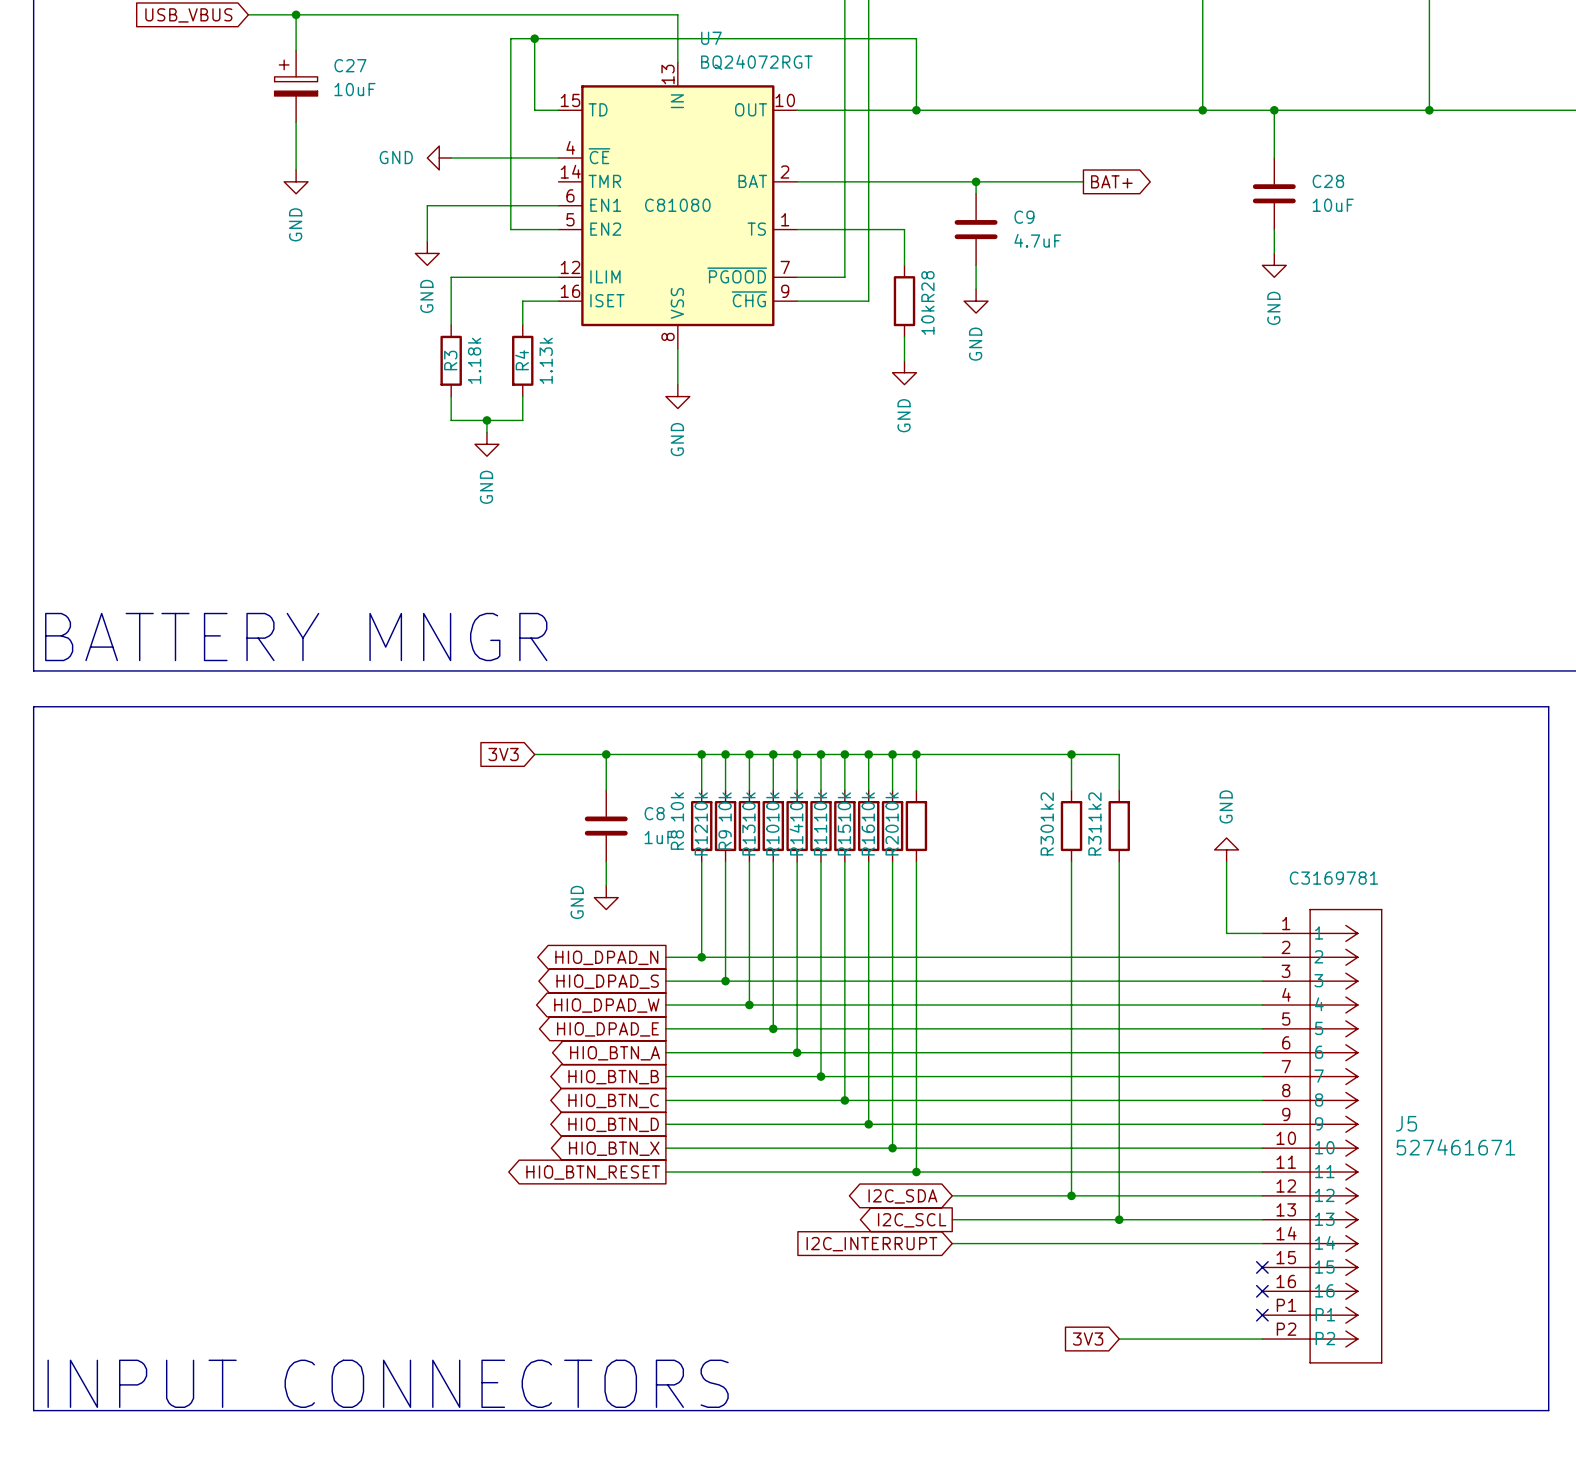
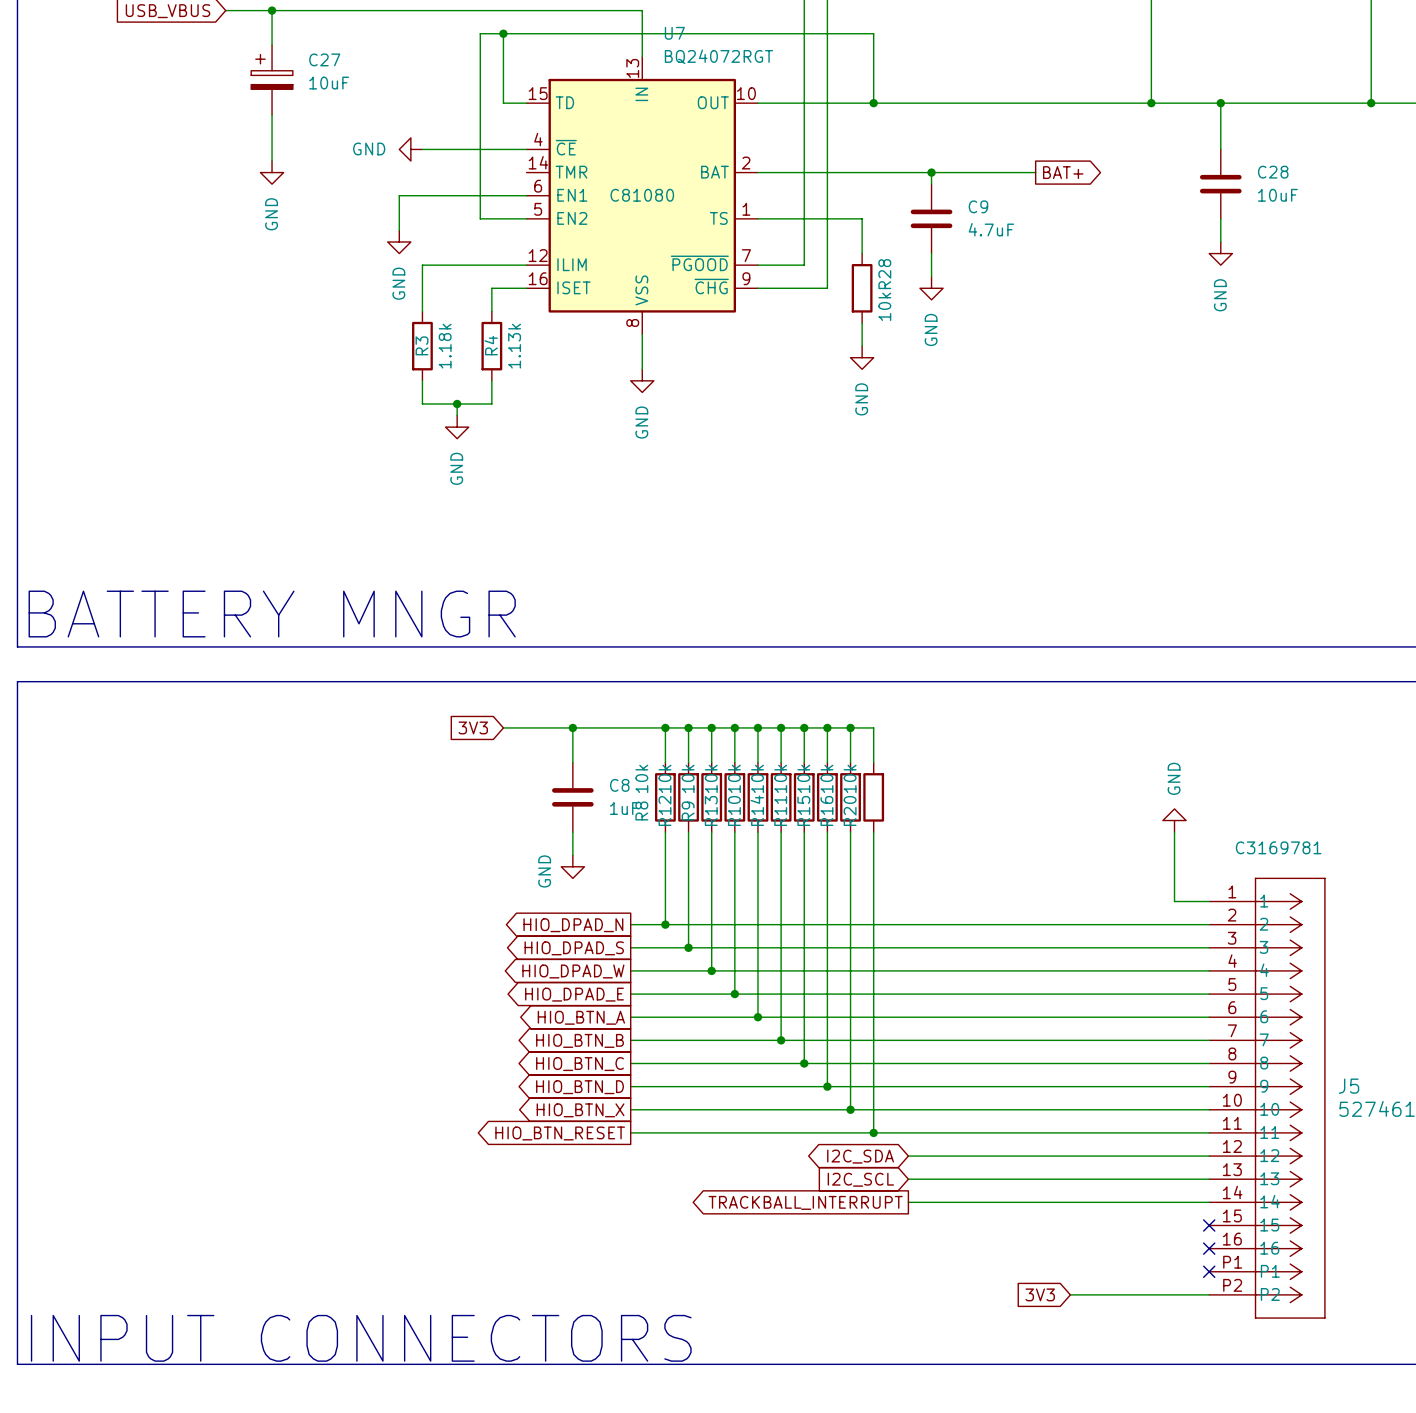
wire: (916, 754) (1119, 754) (1119, 790) -> none
junction: (916, 754) -> none
wire: (1071, 754) (1071, 790) -> none
junction: (1071, 754) -> none
R30: 1k2 (1071, 826) -> none
R31: 1k2 (1119, 826) -> none
wire: (1071, 861) (1071, 1195) -> none
wire: (1119, 861) (1119, 1219) -> none
junction: (1071, 1195) -> none
junction: (1119, 1219) -> none
global label shape: output (912, 1220) -> input (860, 1179)
global label shape: input (871, 1244) -> output (805, 1202)
global label: I2C_INTERRUPT (871, 1244) -> TRACKBALL_INTERRUPT (805, 1202)

